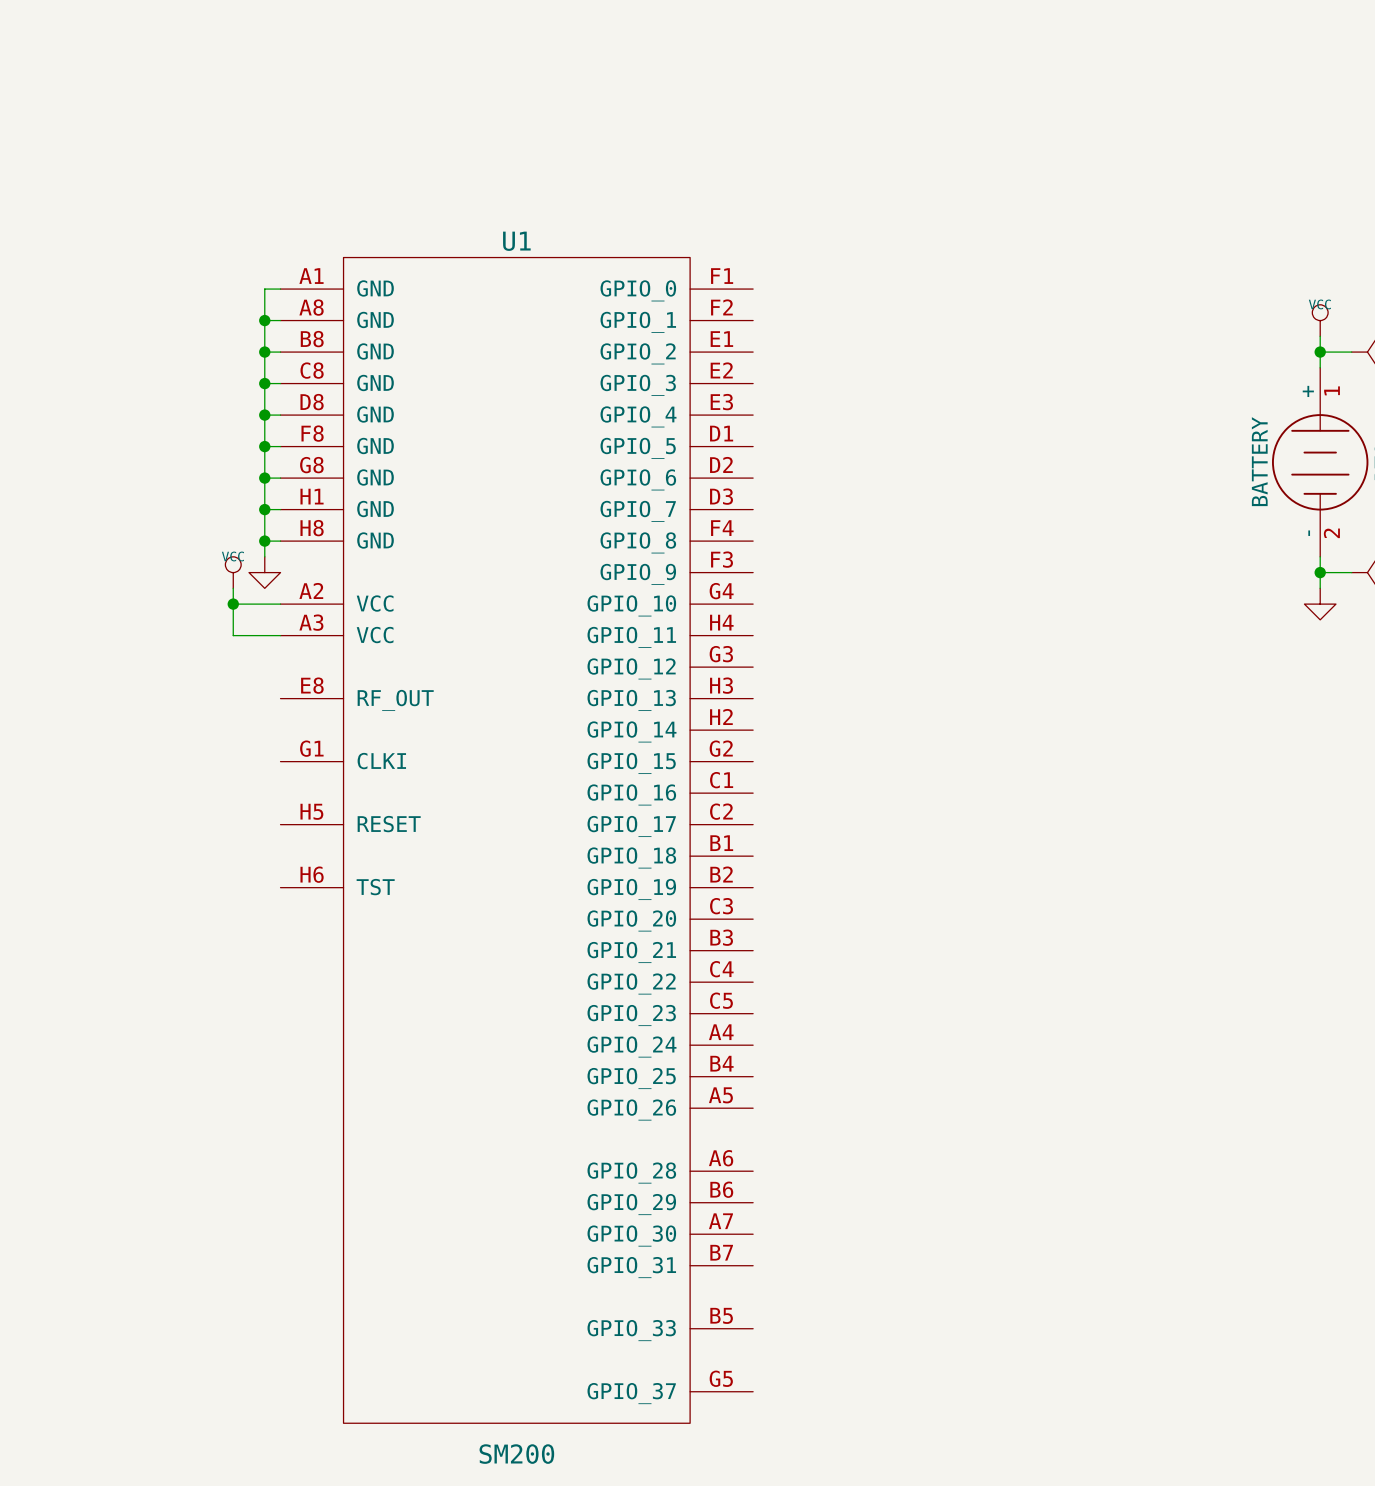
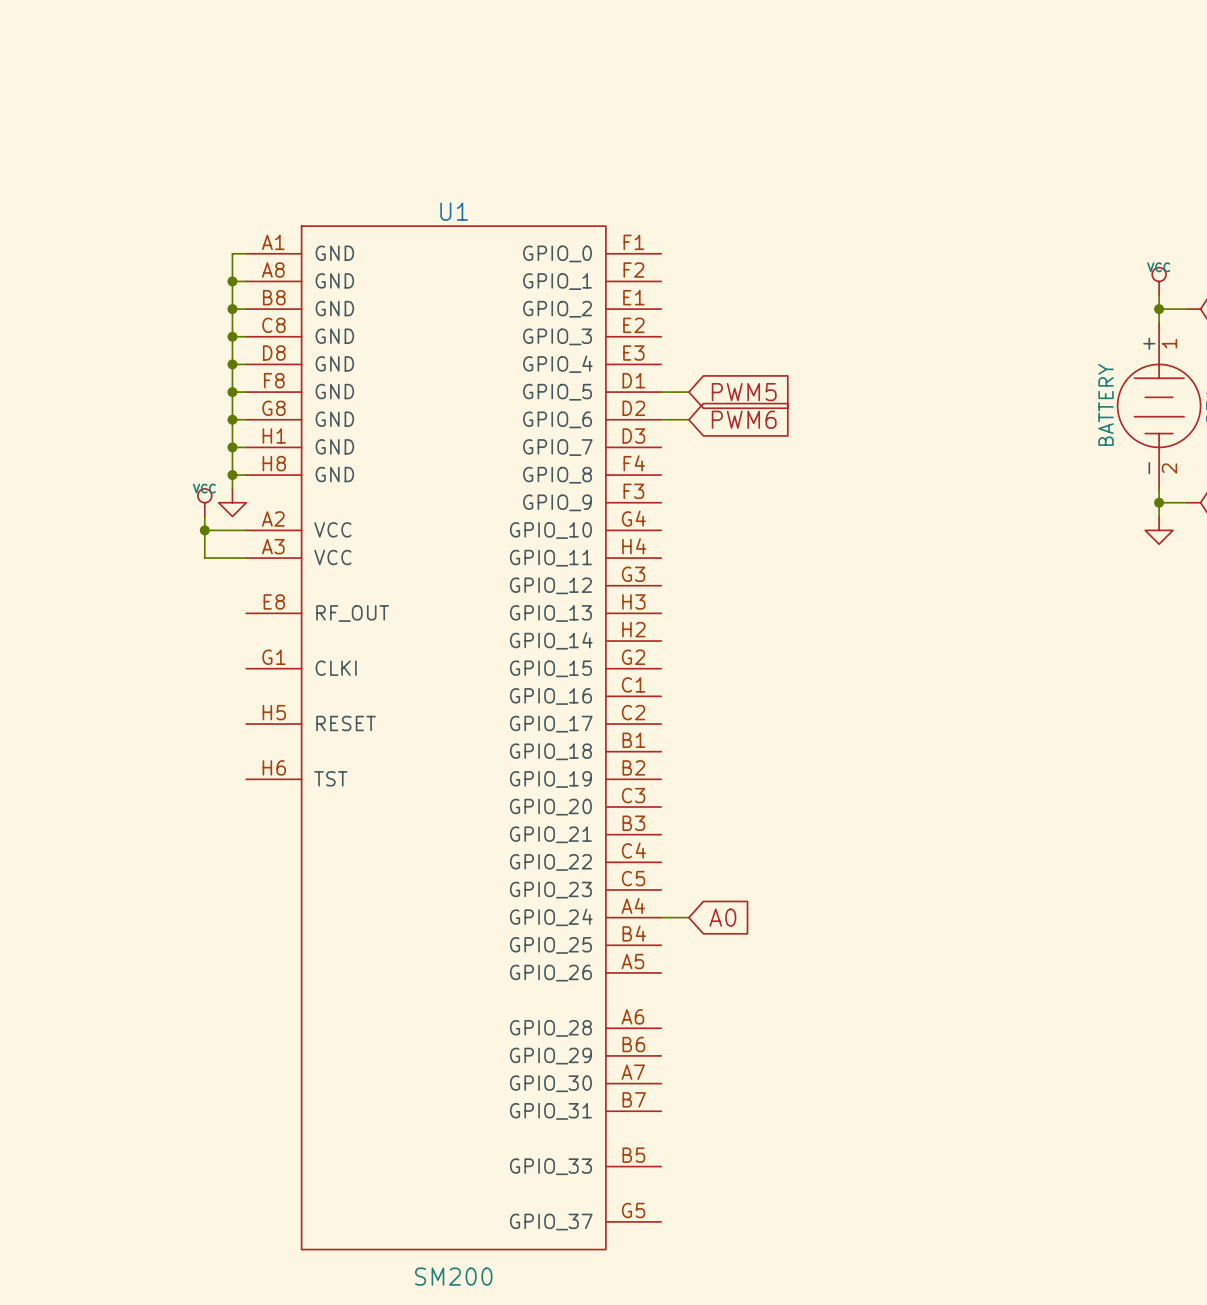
wire: none -> (661, 392) (688, 392)
global label: none -> PWM5 (744, 392)
wire: none -> (661, 419) (688, 419)
global label: none -> PWM6 (744, 419)
wire: none -> (661, 917) (688, 917)
global label: none -> A0 (722, 917)

